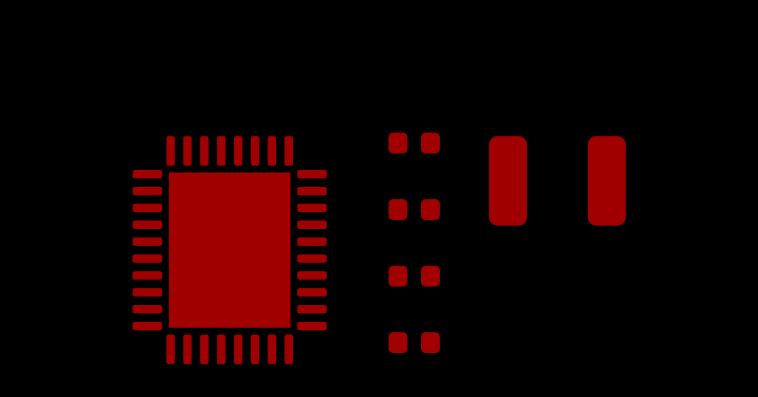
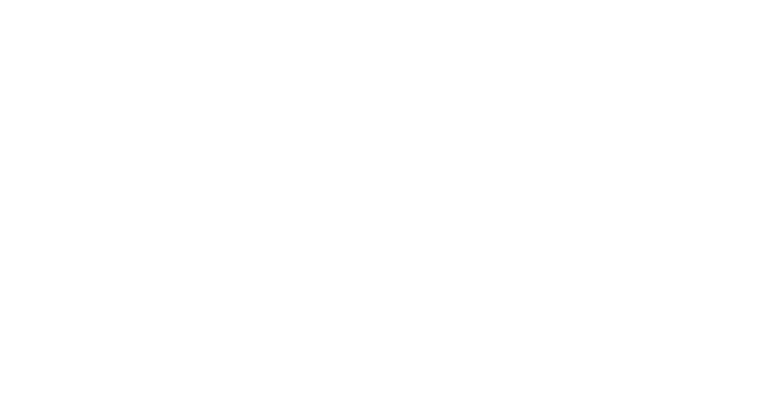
part: (414, 143) -> none
part: (557, 180) -> none
part: (414, 209) -> none
part: (229, 250) -> none
part: (414, 276) -> none
part: (414, 342) -> none

